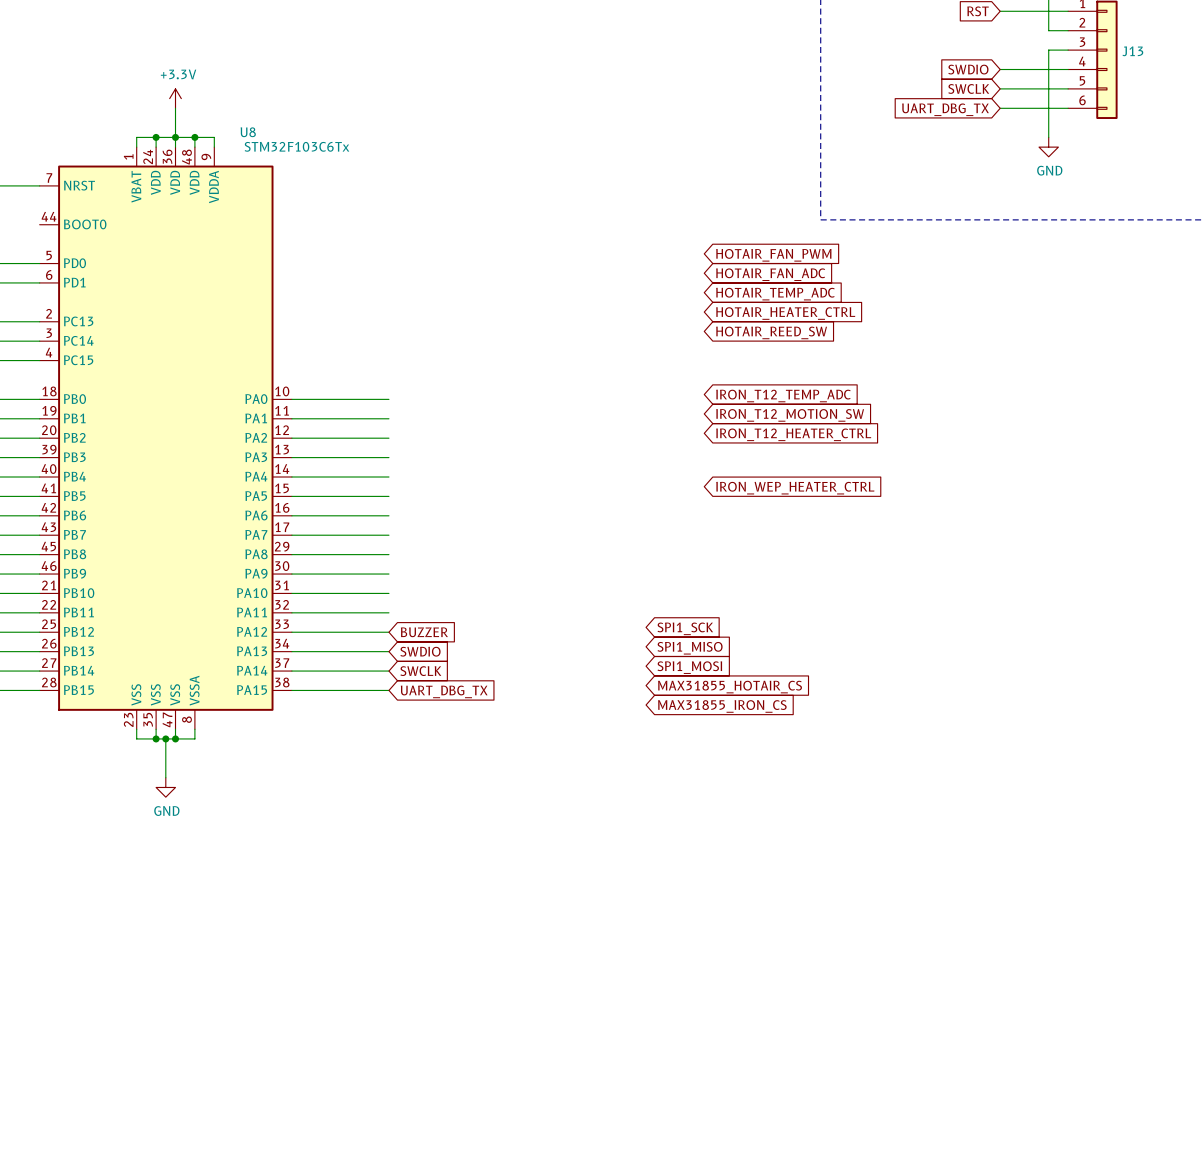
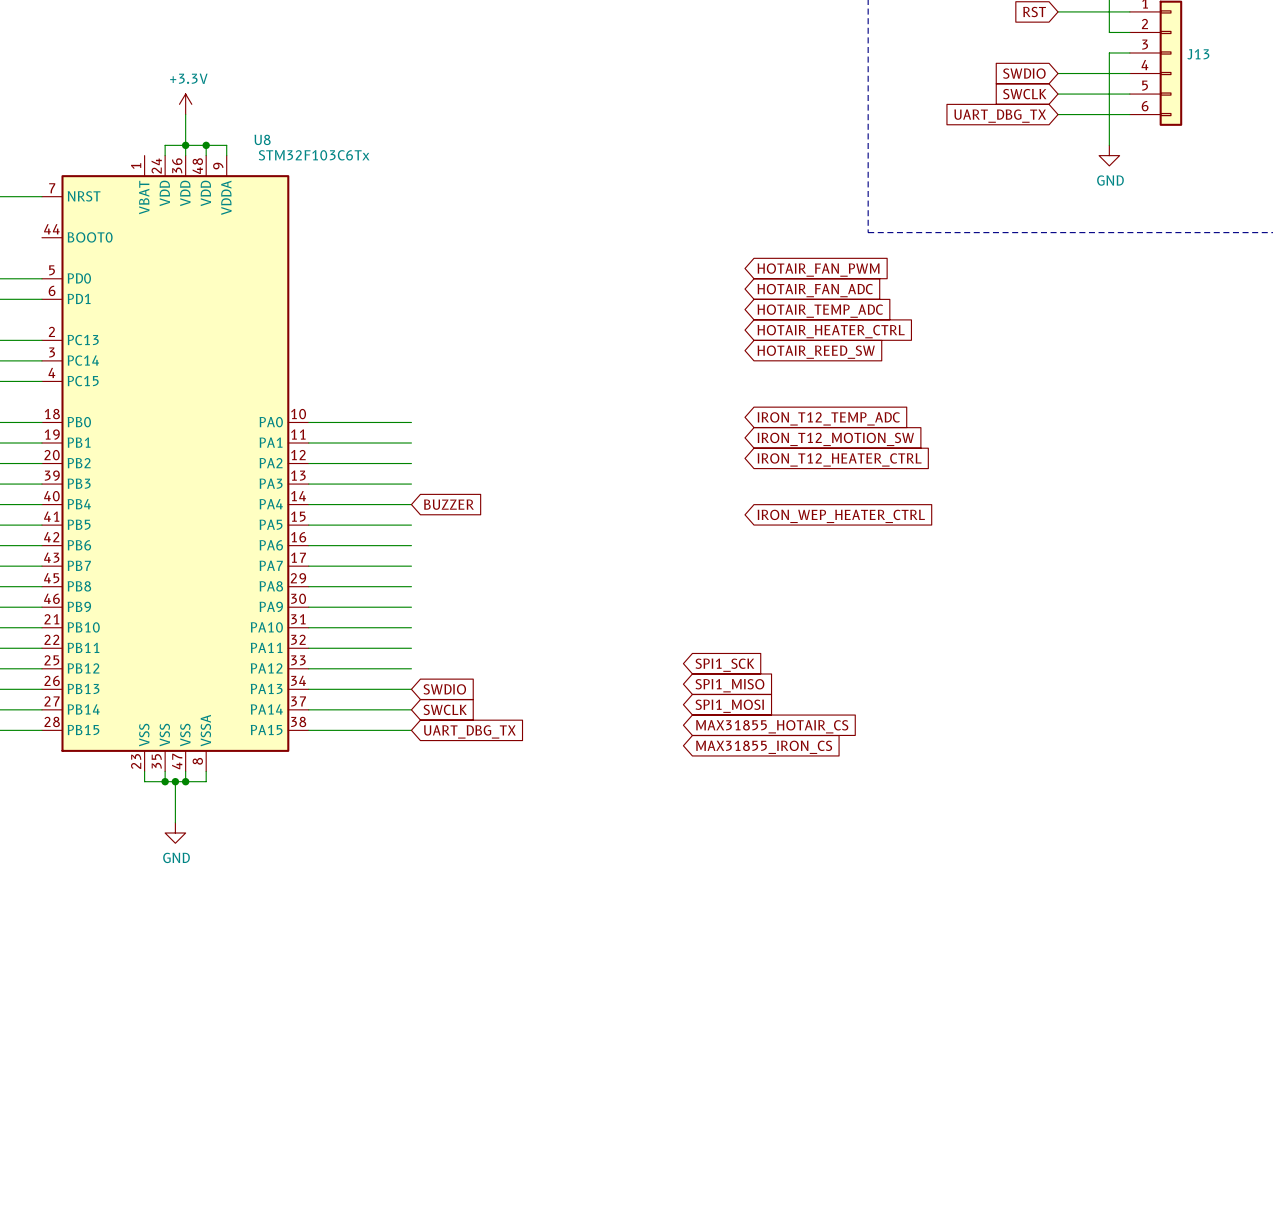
wire: (156, 137) (136, 137) (136, 147) -> none
junction: (156, 137) -> none
global label position: BUZZER (424, 632) -> BUZZER (448, 504)

